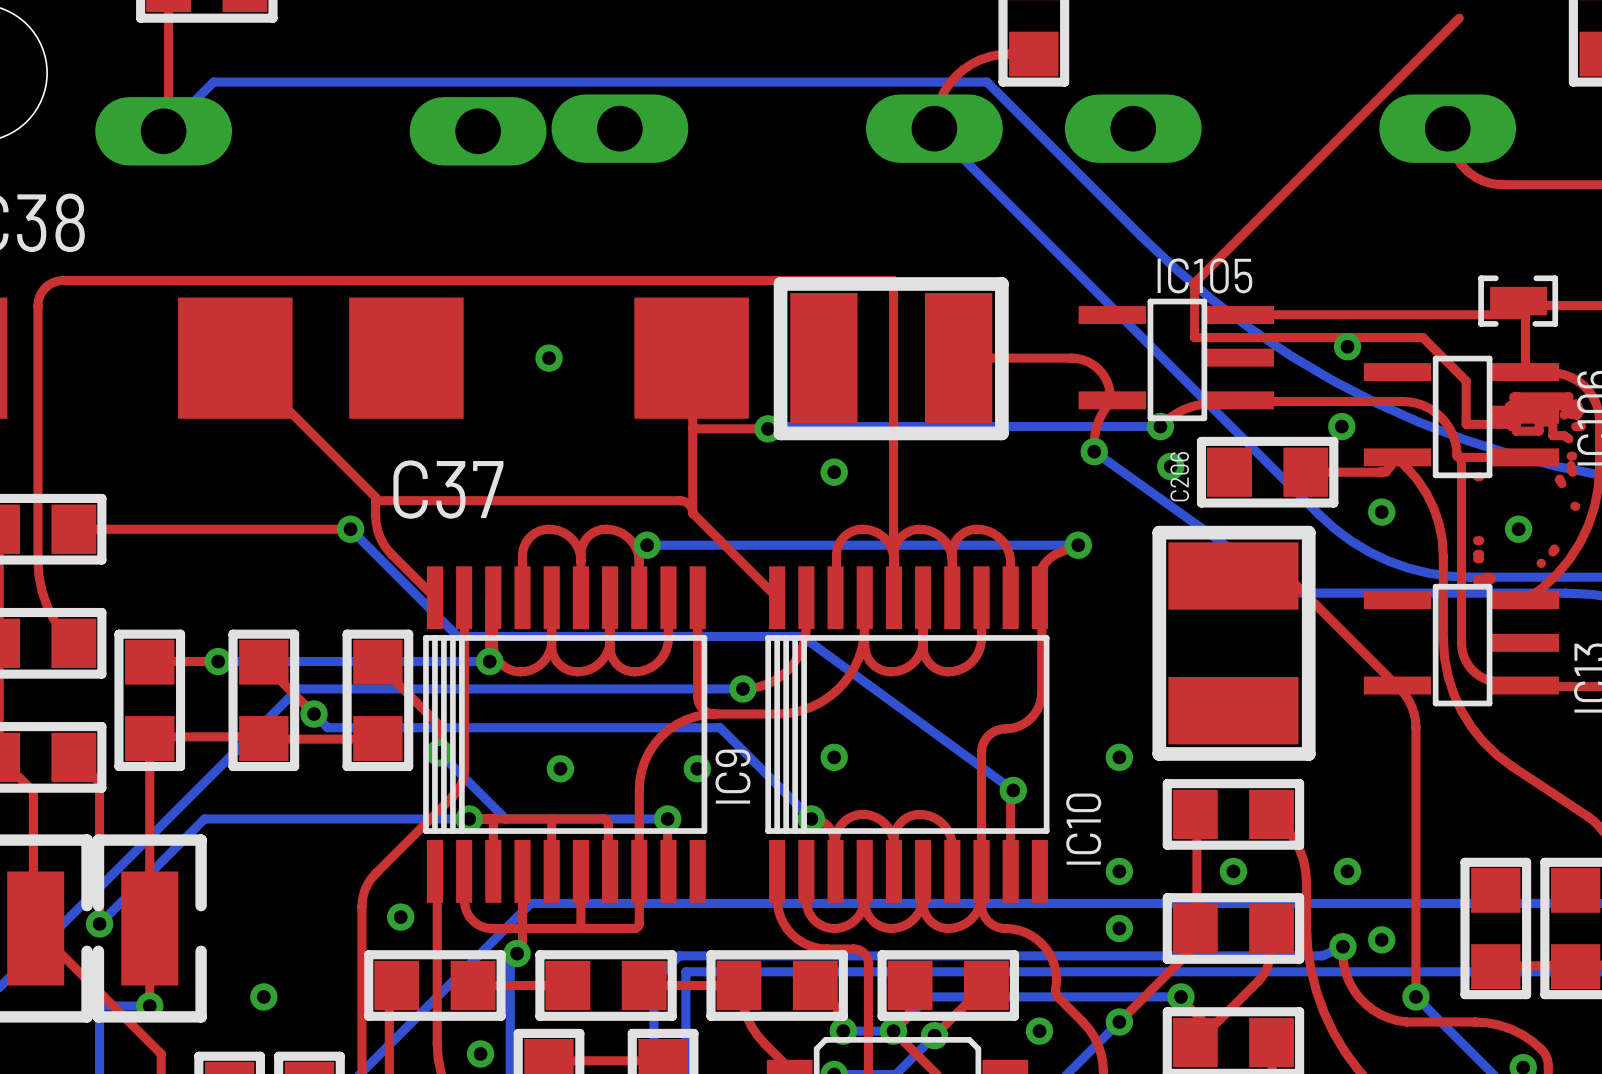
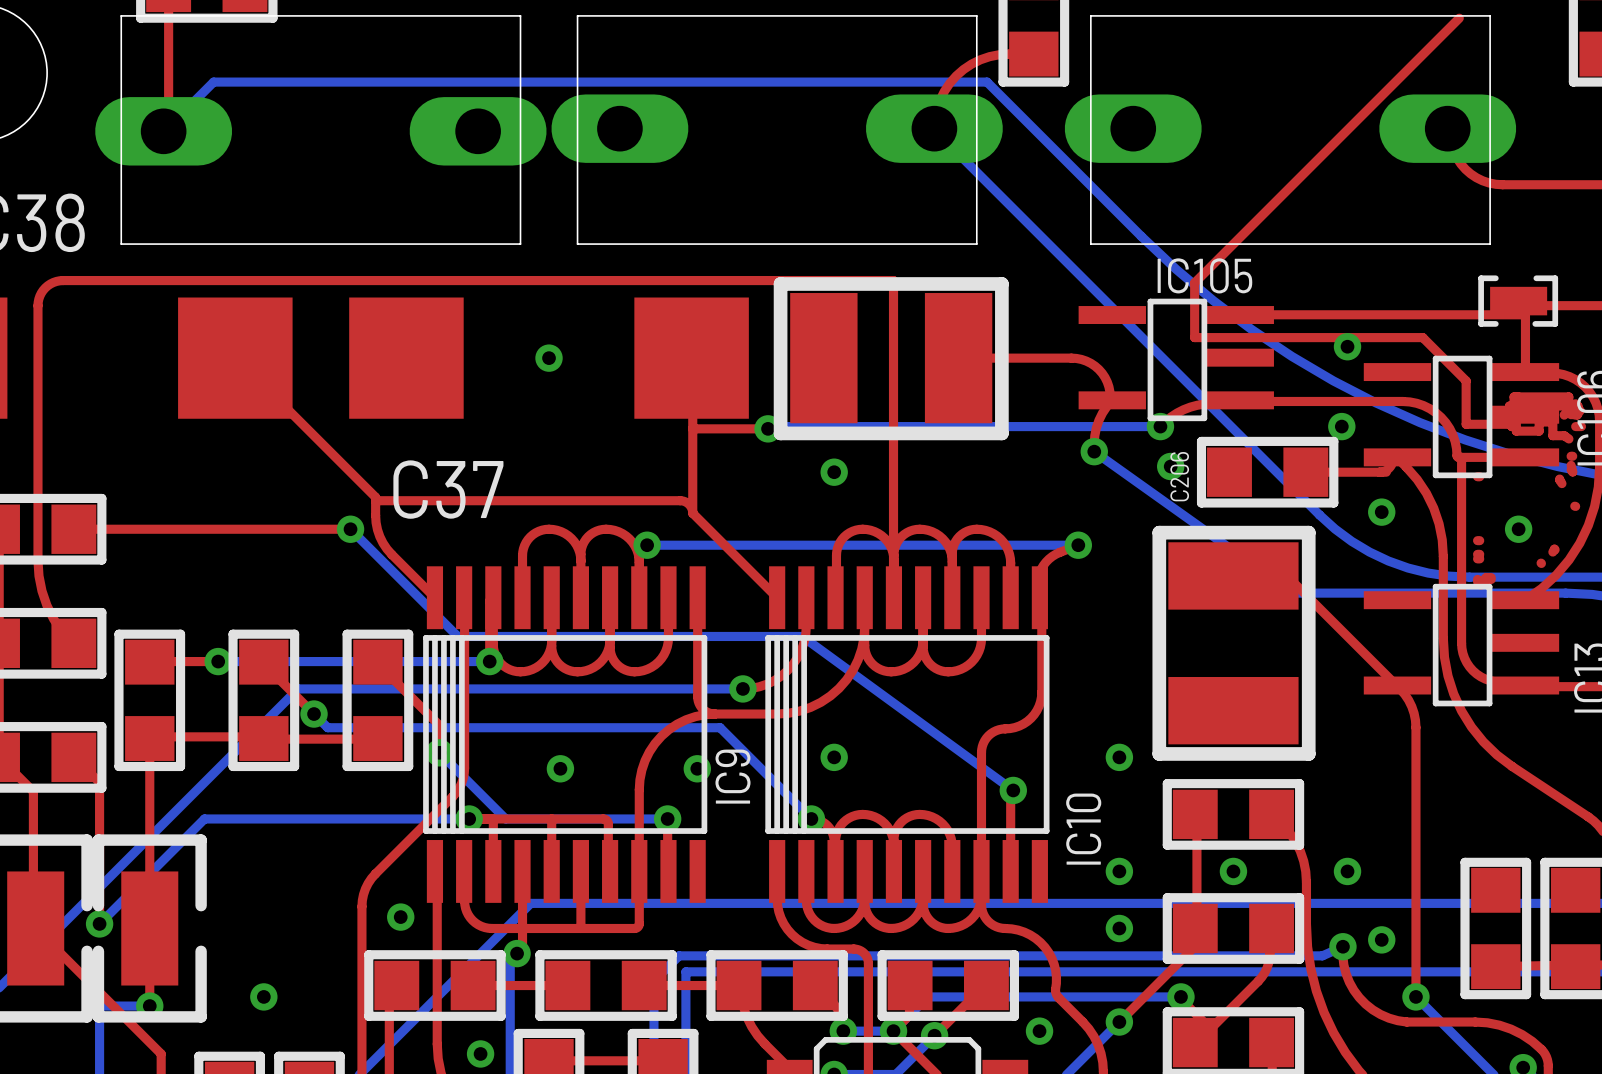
board edge: none -> (121, 15) (121, 244) (520, 244) (520, 15) (121, 15)
board edge: none -> (577, 15) (976, 15) (976, 244) (577, 244) (577, 15)
board edge: none -> (1090, 15) (1490, 15) (1490, 244) (1090, 244) (1090, 15)

